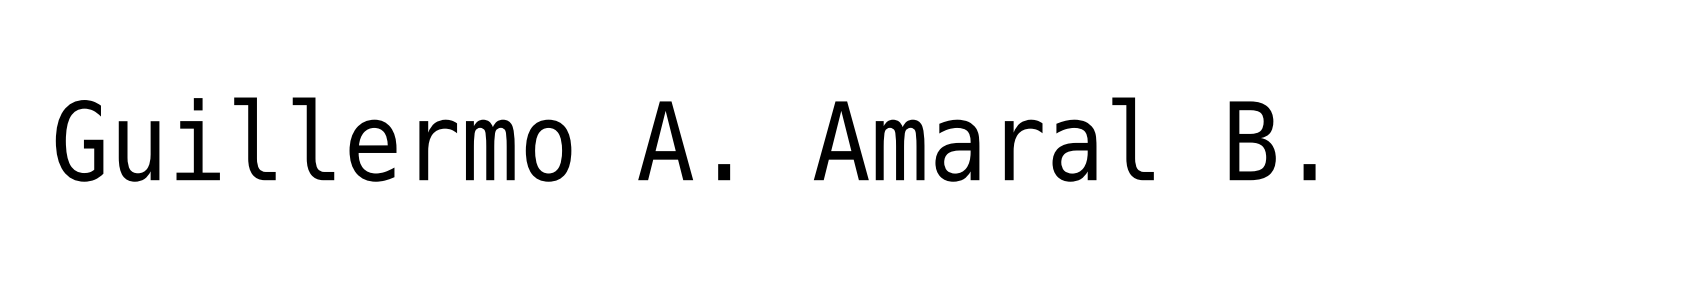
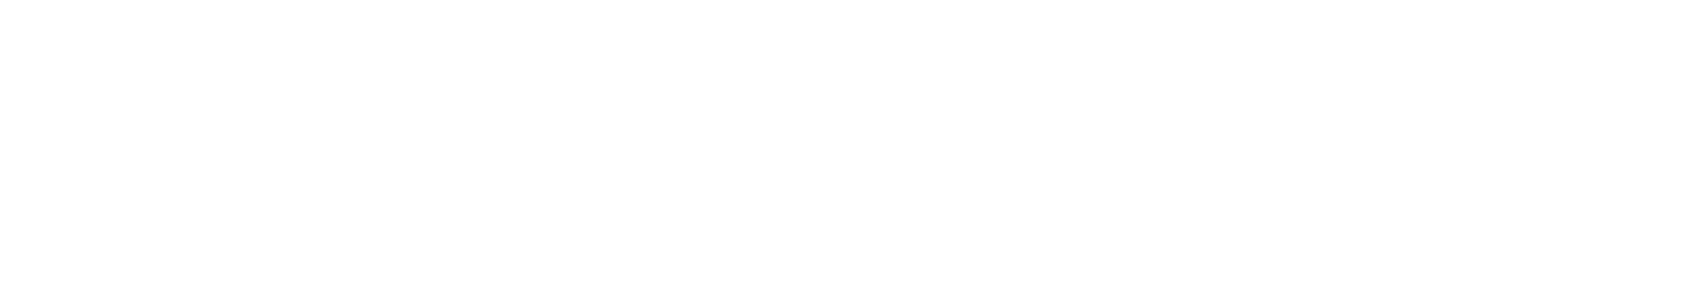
text: Guillermo A. Amaral B. (685, 139) -> none

